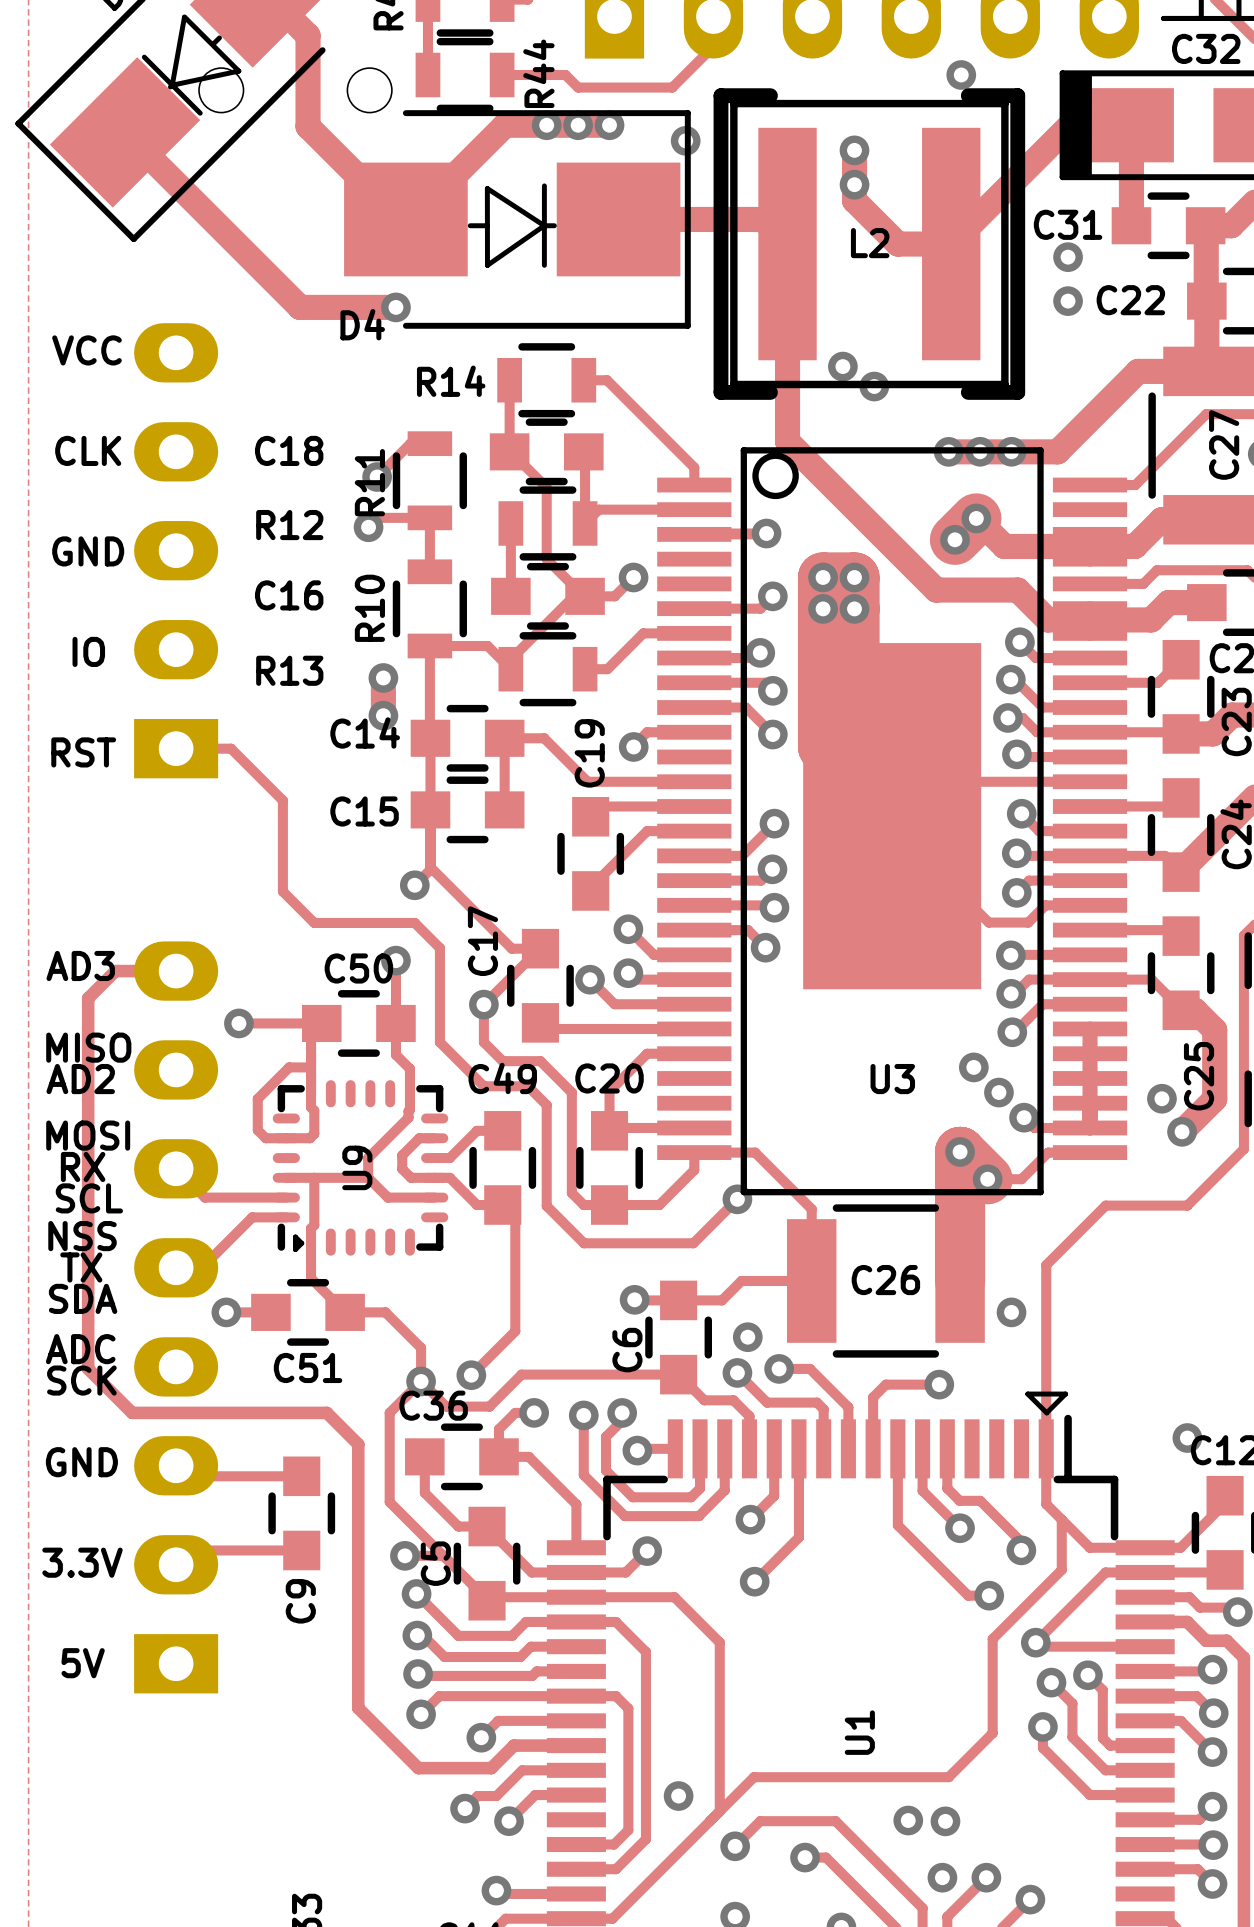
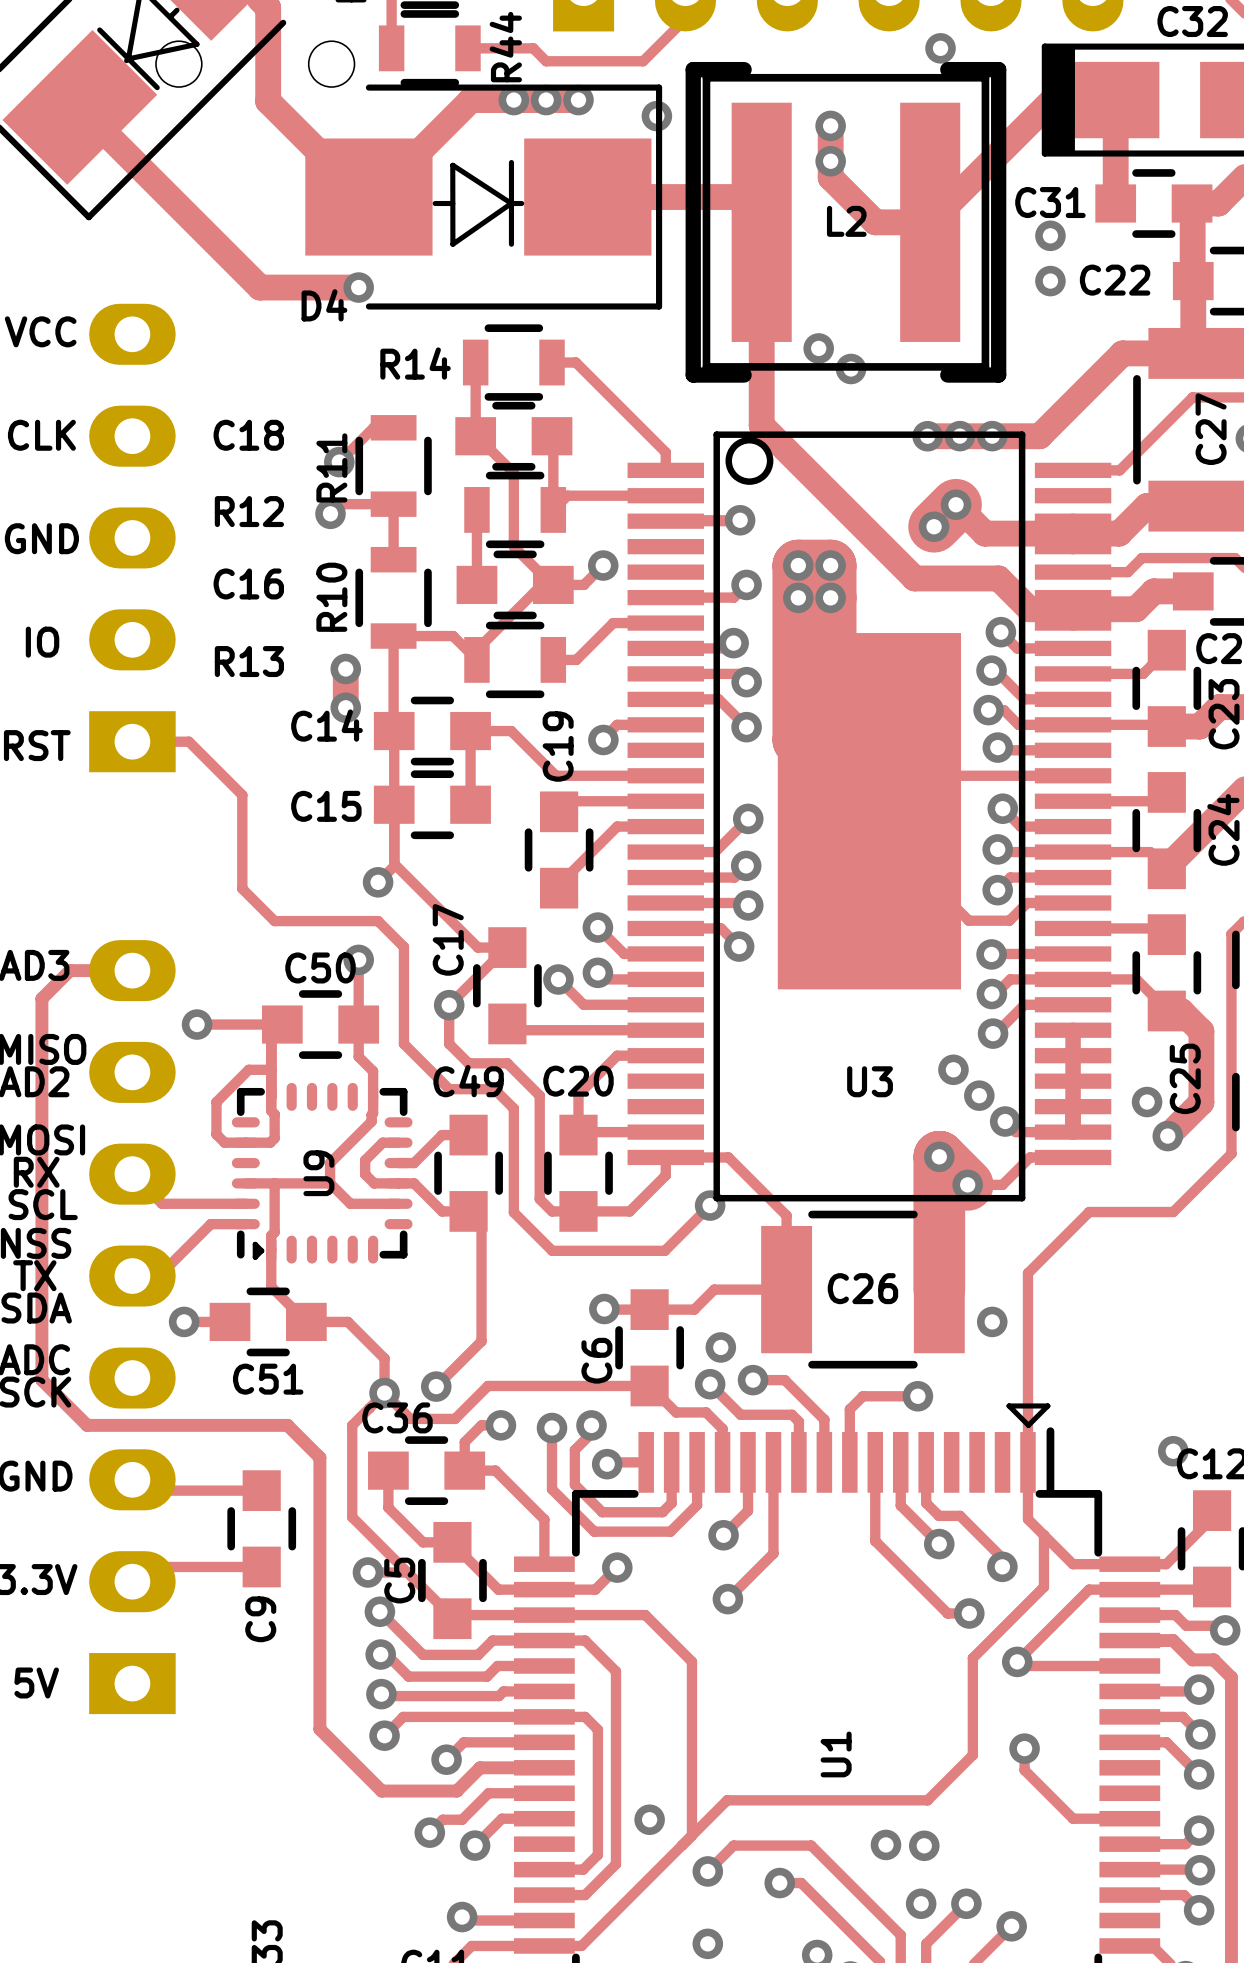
track: (1087, 1675) (1102, 1690) (1102, 1738) (1110, 1745) (1145, 1745) -> none
via: (1087, 1675) -> none
track: (1051, 1682) (1072, 1703) (1072, 1737) (1105, 1770) (1145, 1770) -> none
via: (1051, 1682) -> none

